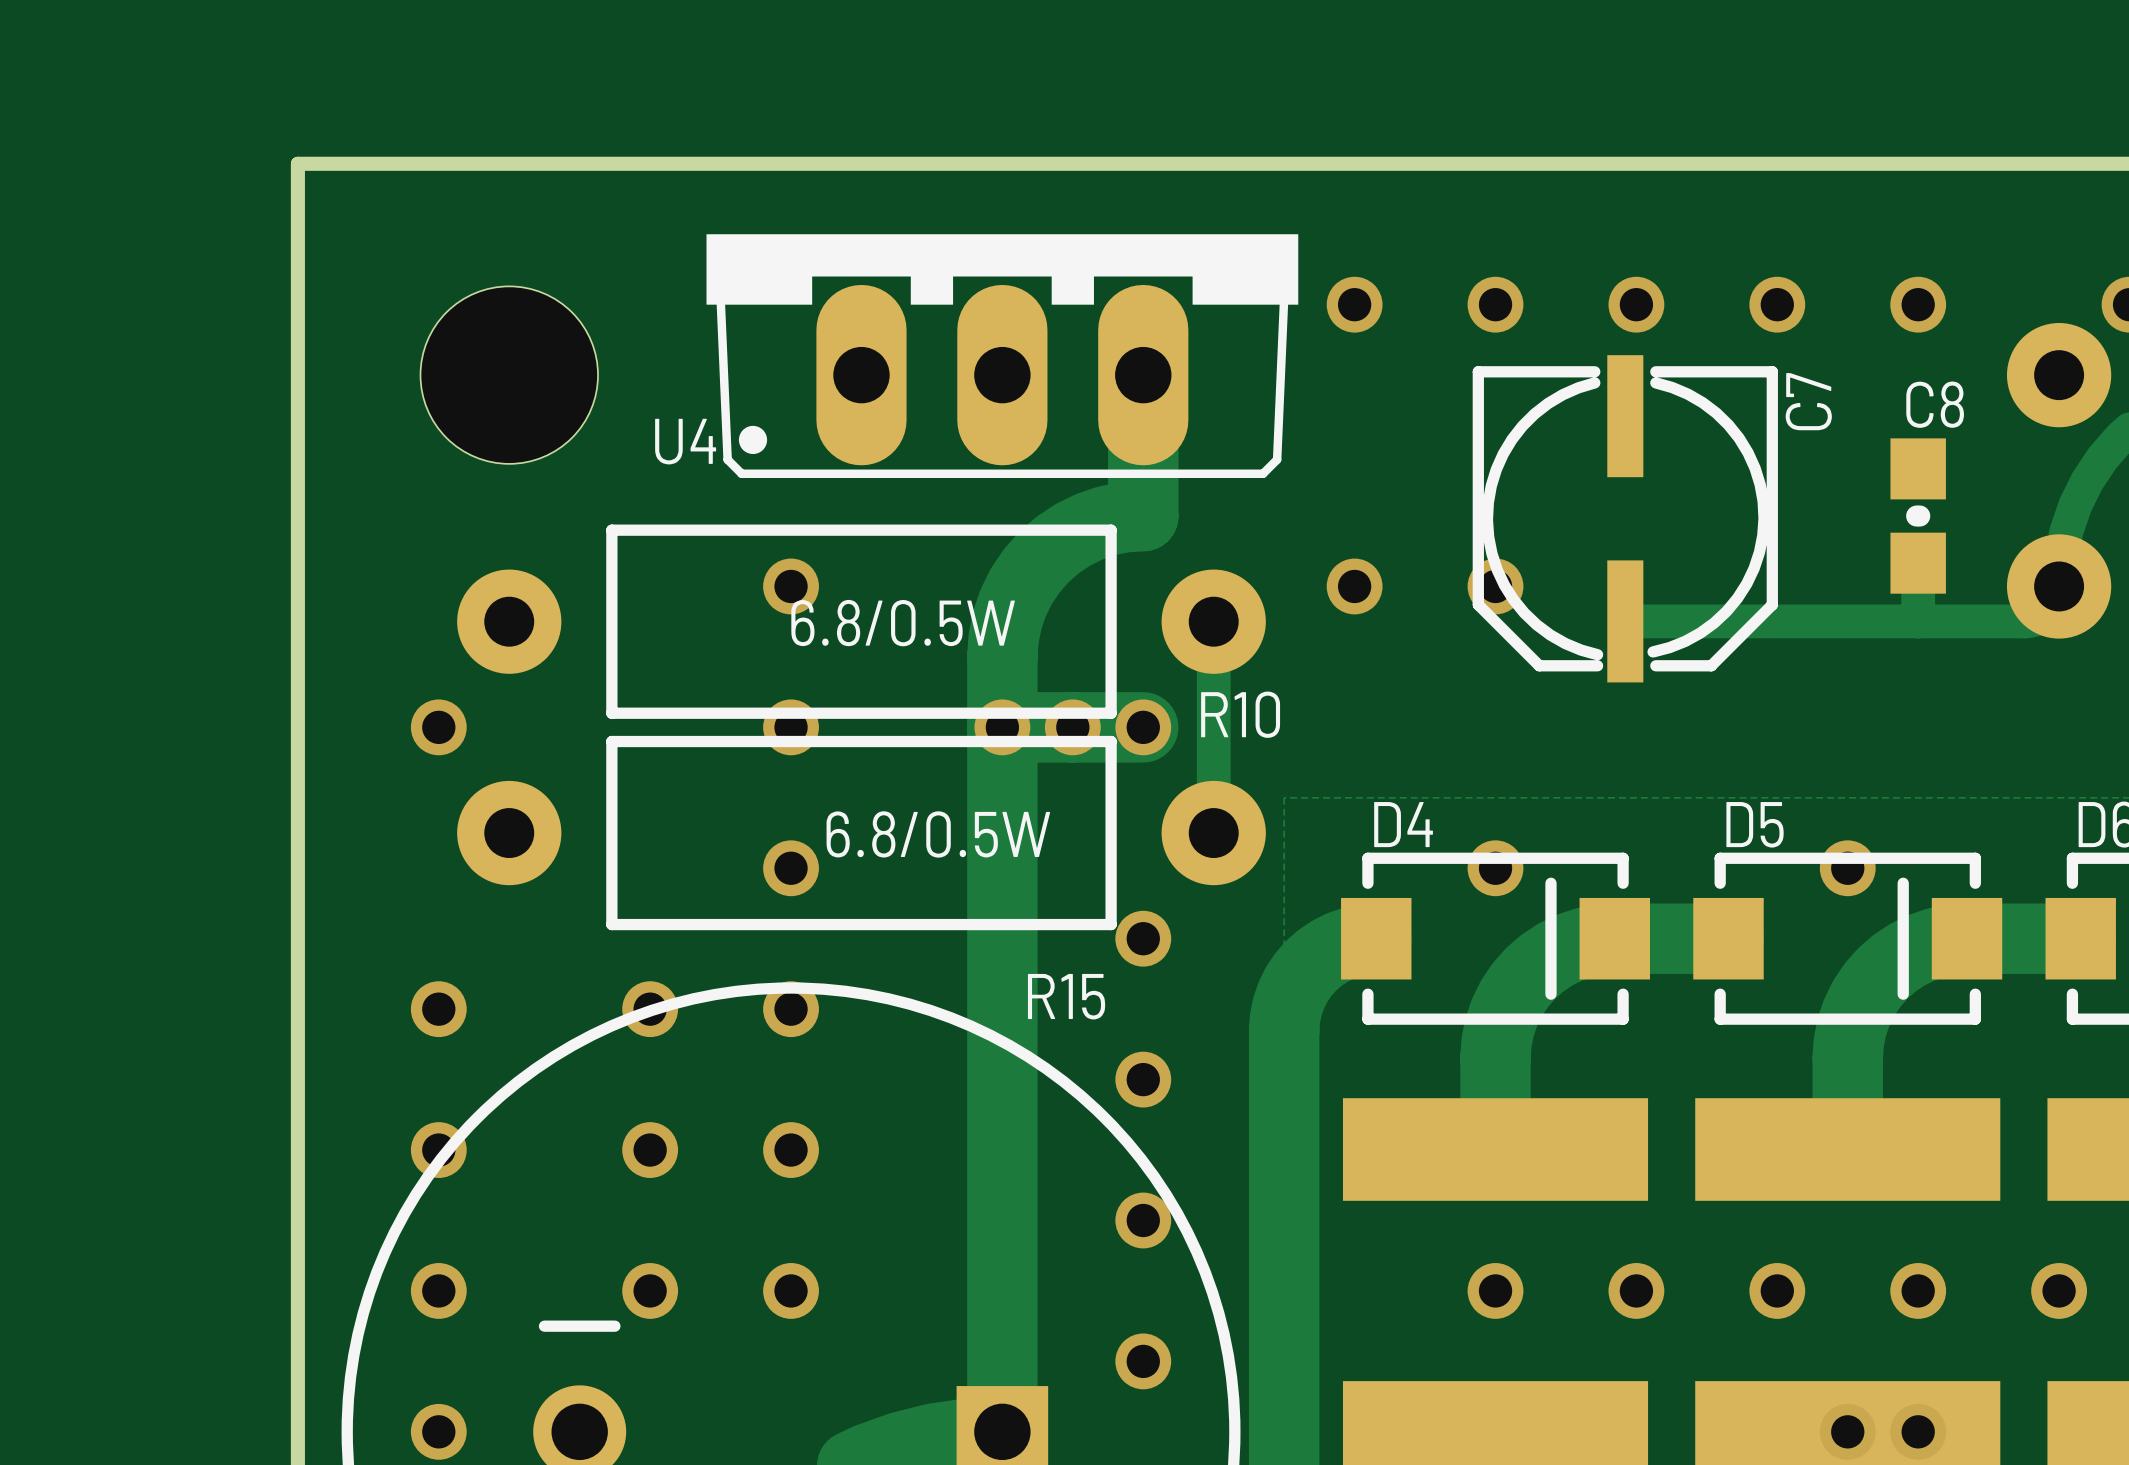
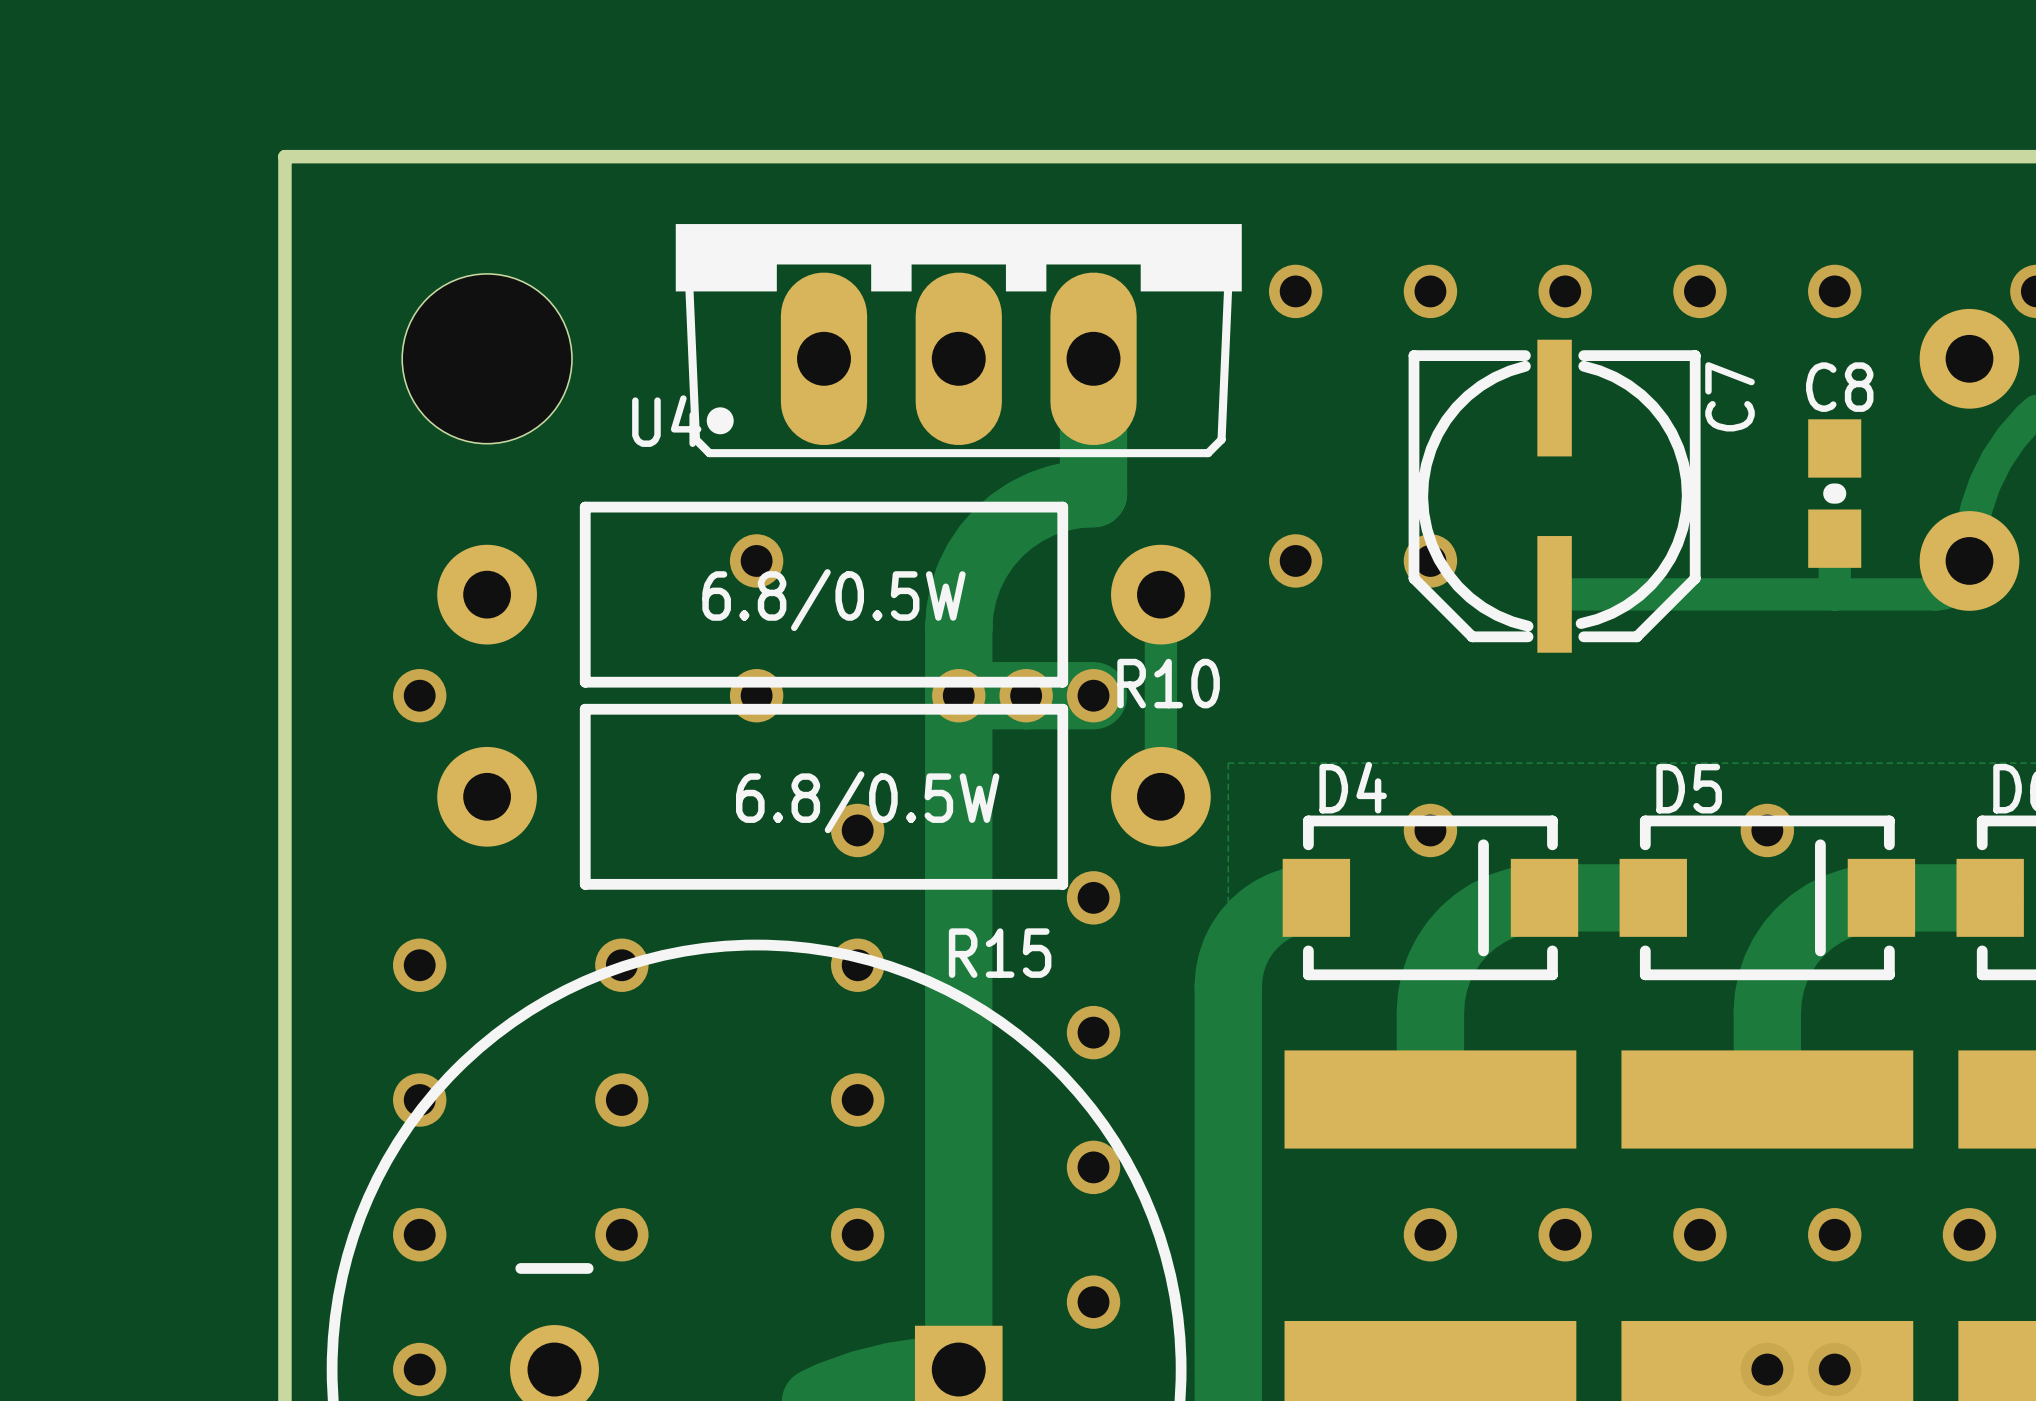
via: (791, 868) -> none
via: none -> (857, 830)
via: (791, 1009) -> none
via: none -> (857, 965)
via: (791, 1150) -> none
via: none -> (857, 1100)
via: (791, 1290) -> none
via: none -> (857, 1234)

